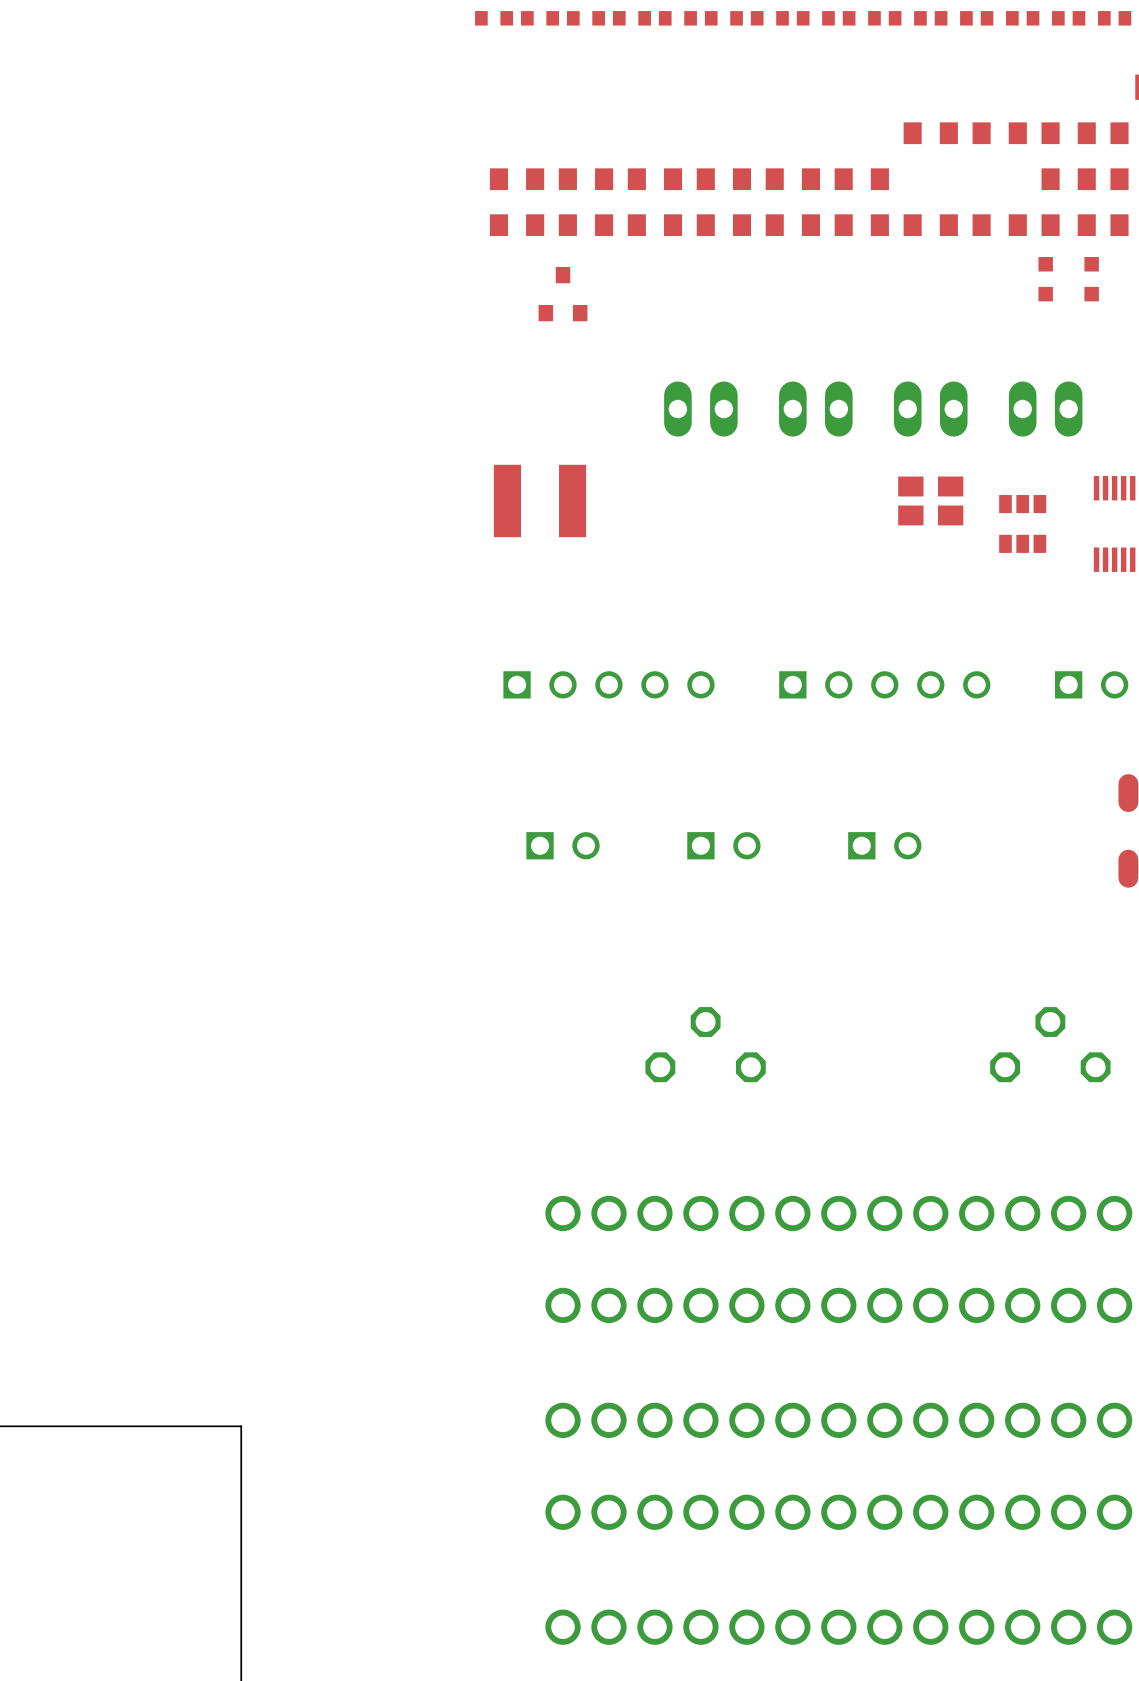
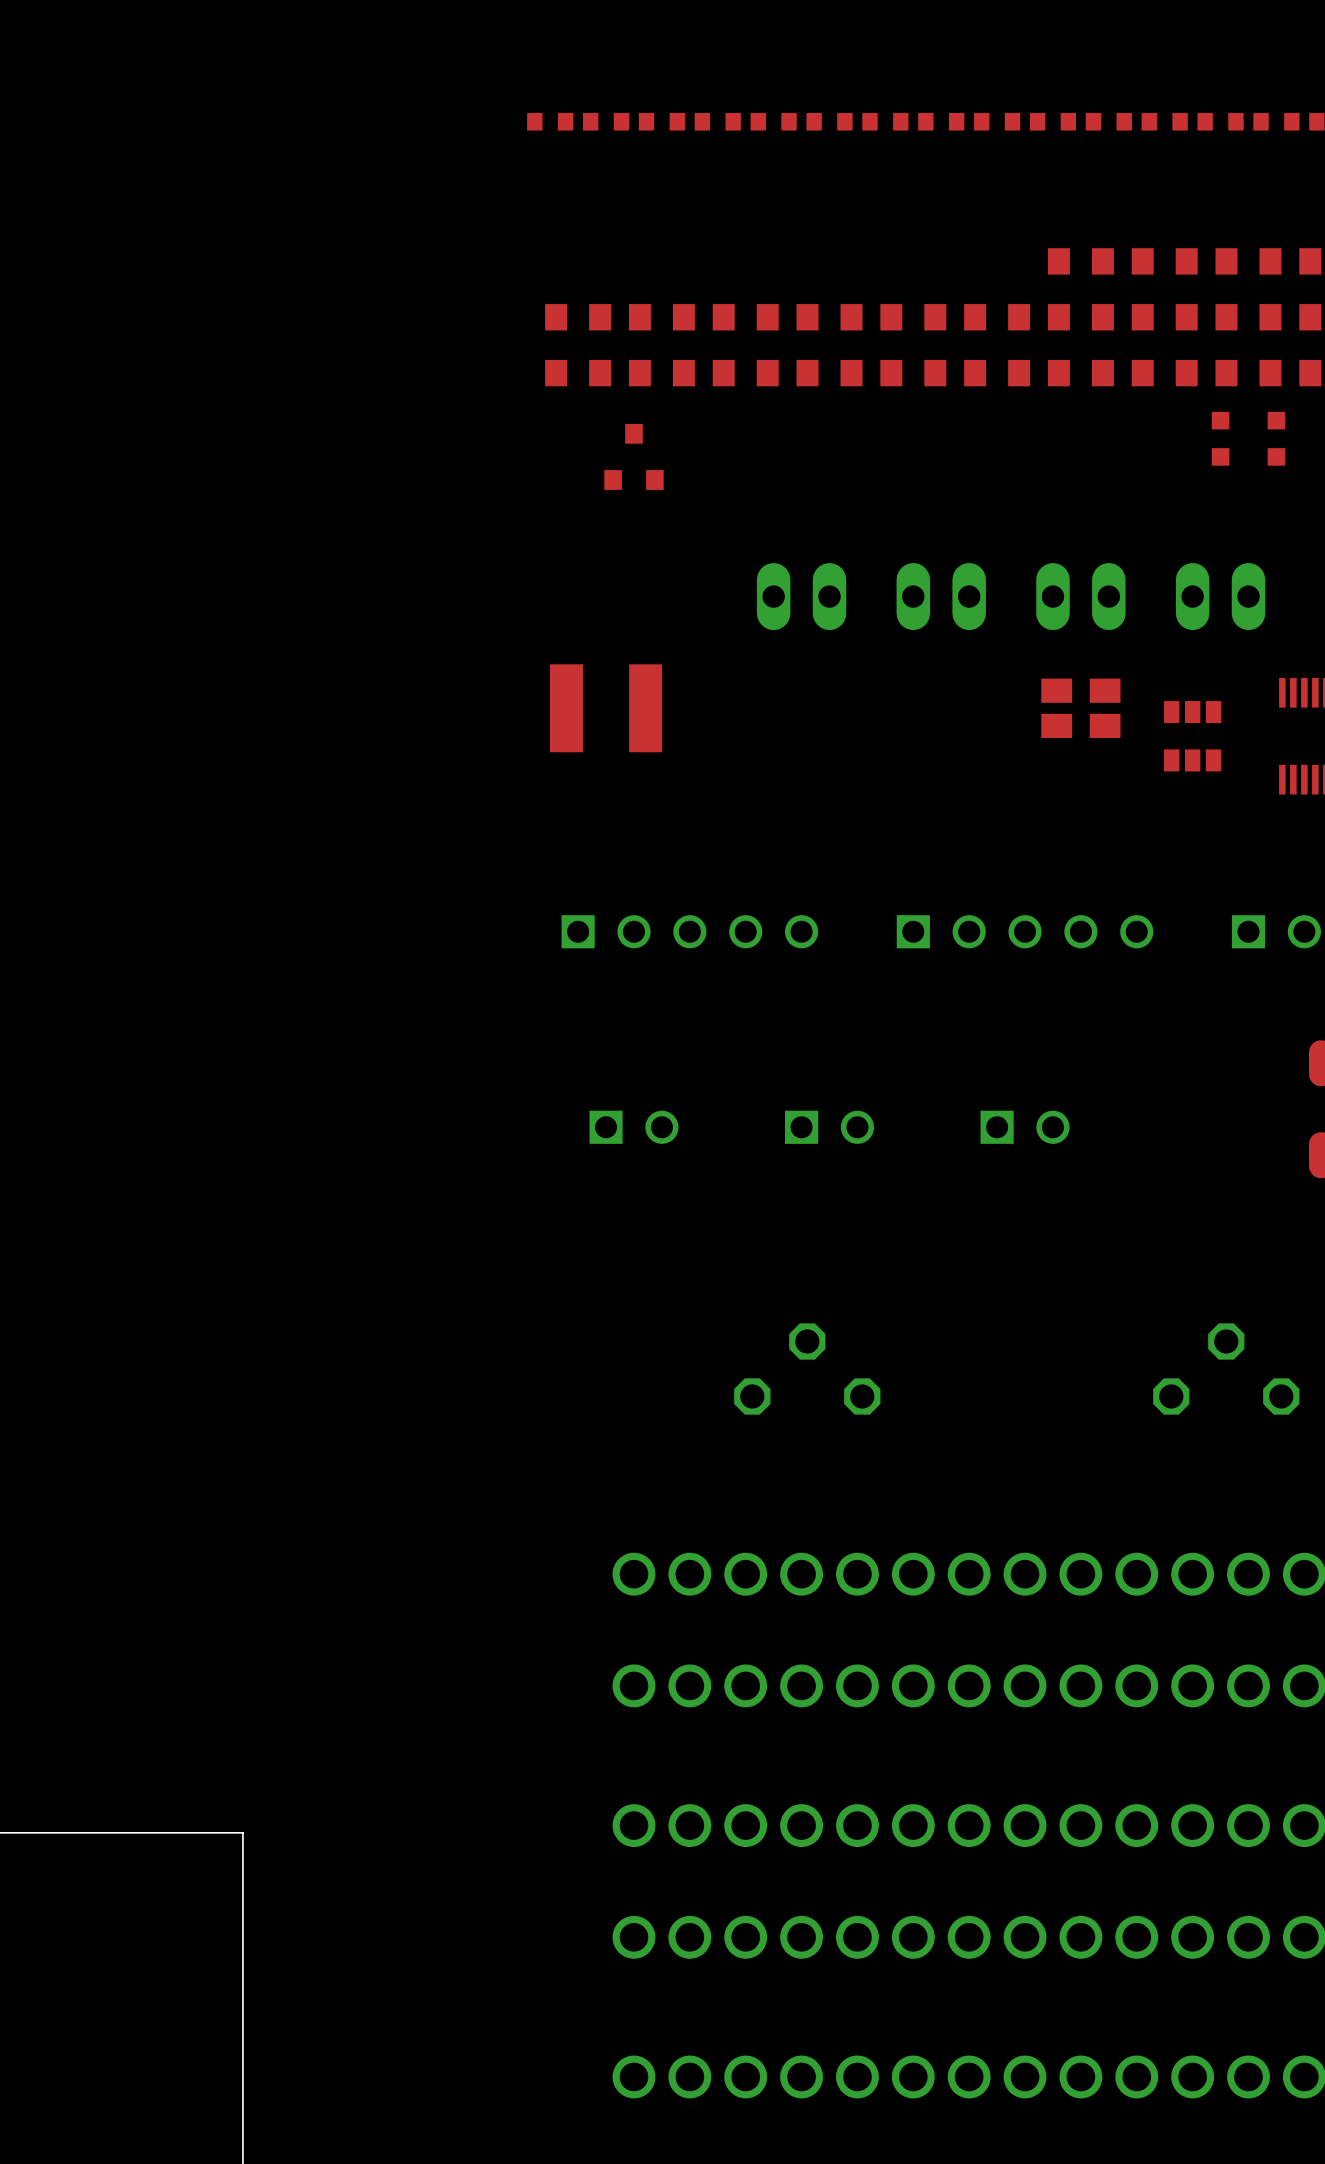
part: none -> (1080, 317)
part: none -> (1164, 317)

